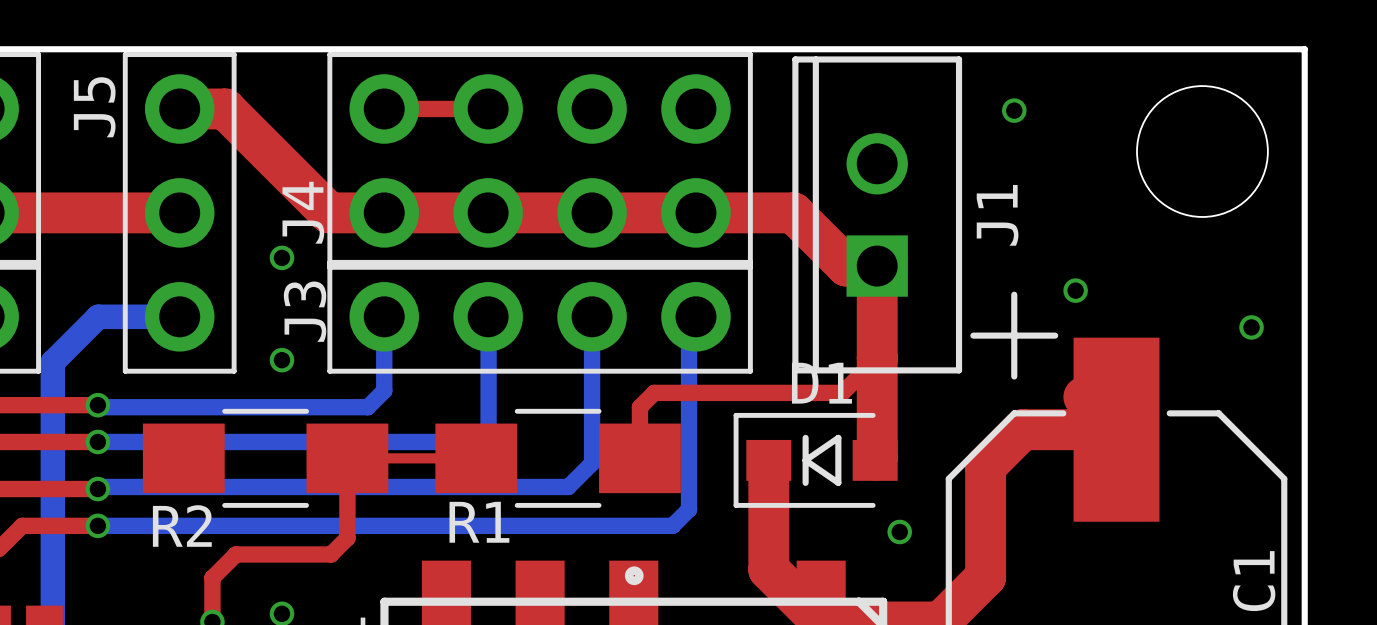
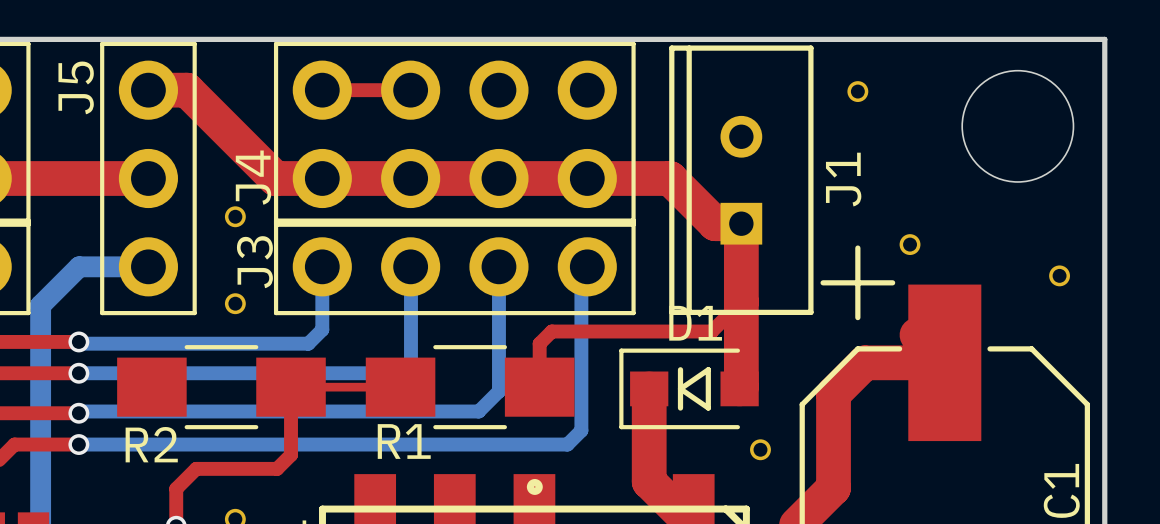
J1 footprint: [792, 56, 963, 374] -> [669, 45, 814, 316]

